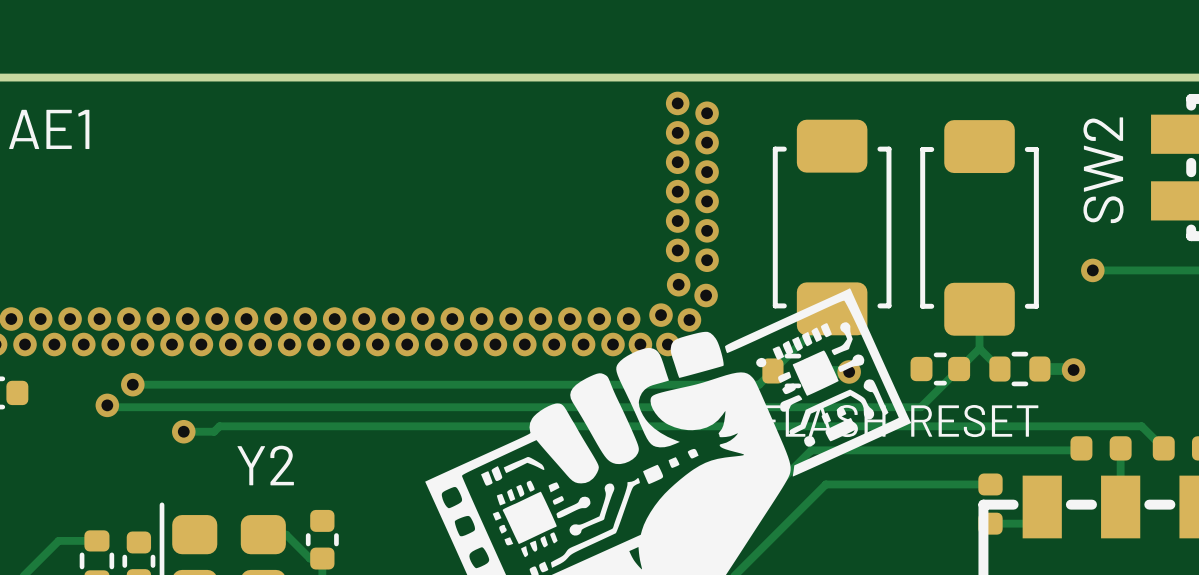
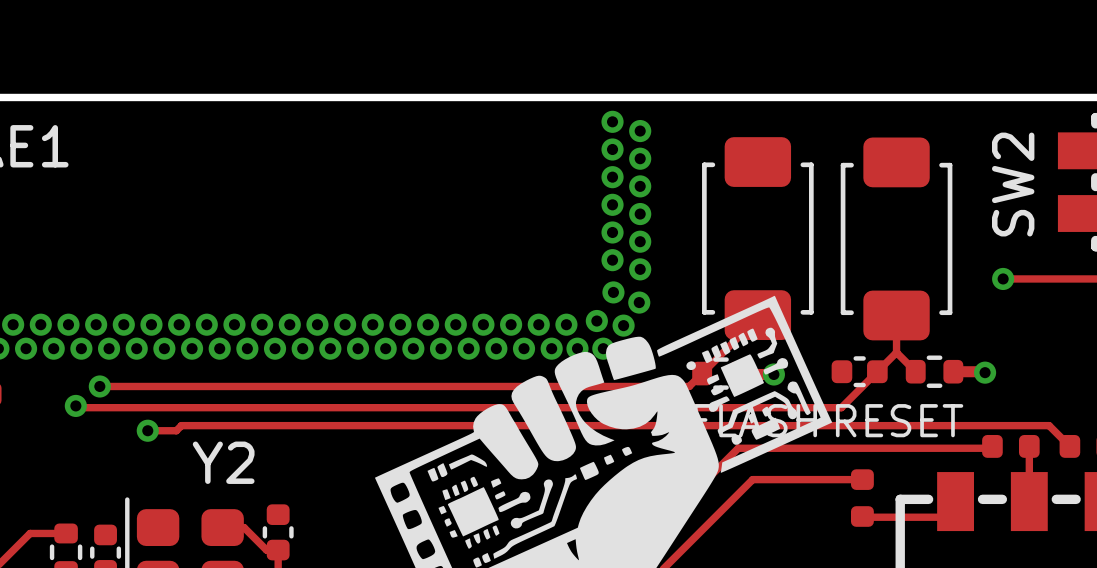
track: (825, 484) (990, 484) -> (751, 480) (862, 479)
part position: (990, 504) -> (862, 498)
track: none -> (862, 516) (906, 517)

